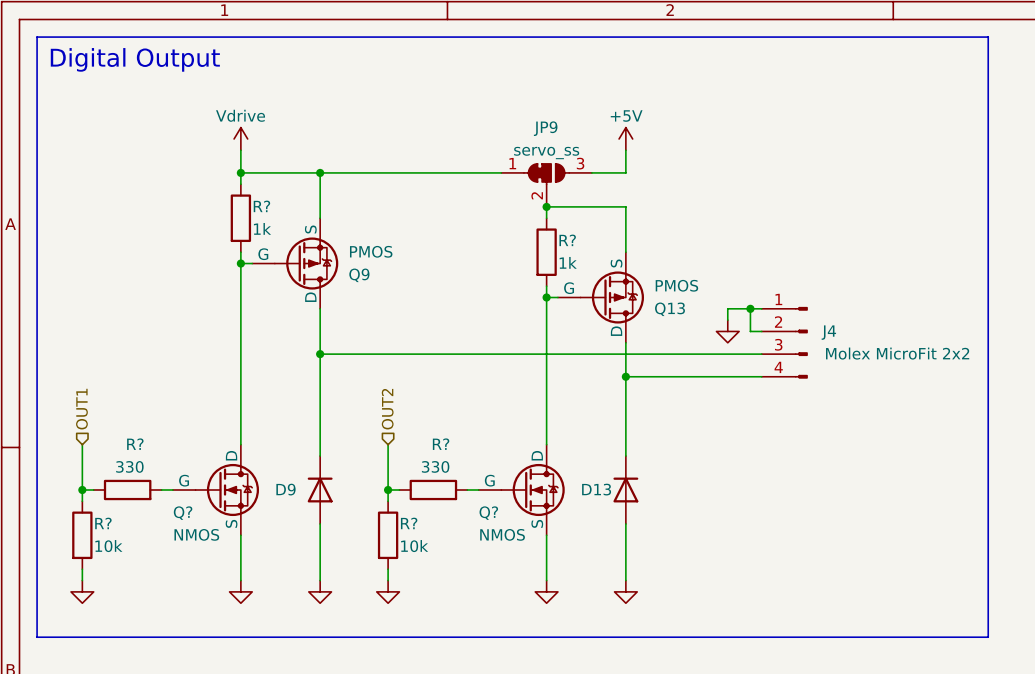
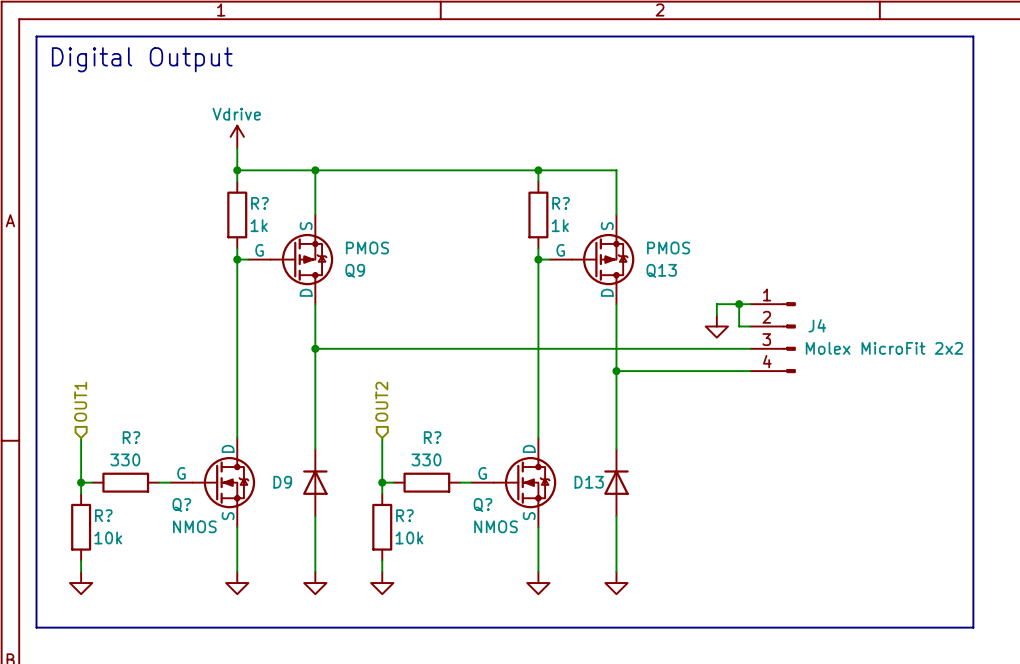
power symbol: +5V (625, 138) -> none
wire: (625, 150) (625, 172) -> (616, 203) (616, 170)
junction: none -> (538, 170)
JP9: servo_ss (546, 185) -> none
junction: (546, 206) -> none
wire: (625, 206) (546, 206) (546, 218) -> none
R? position: (546, 252) -> (538, 214)
junction: none -> (538, 259)
wire: (546, 297) (557, 297) -> (538, 259) (549, 259)
junction: (546, 297) -> none
Q13 position: (600, 297) -> (591, 259)

